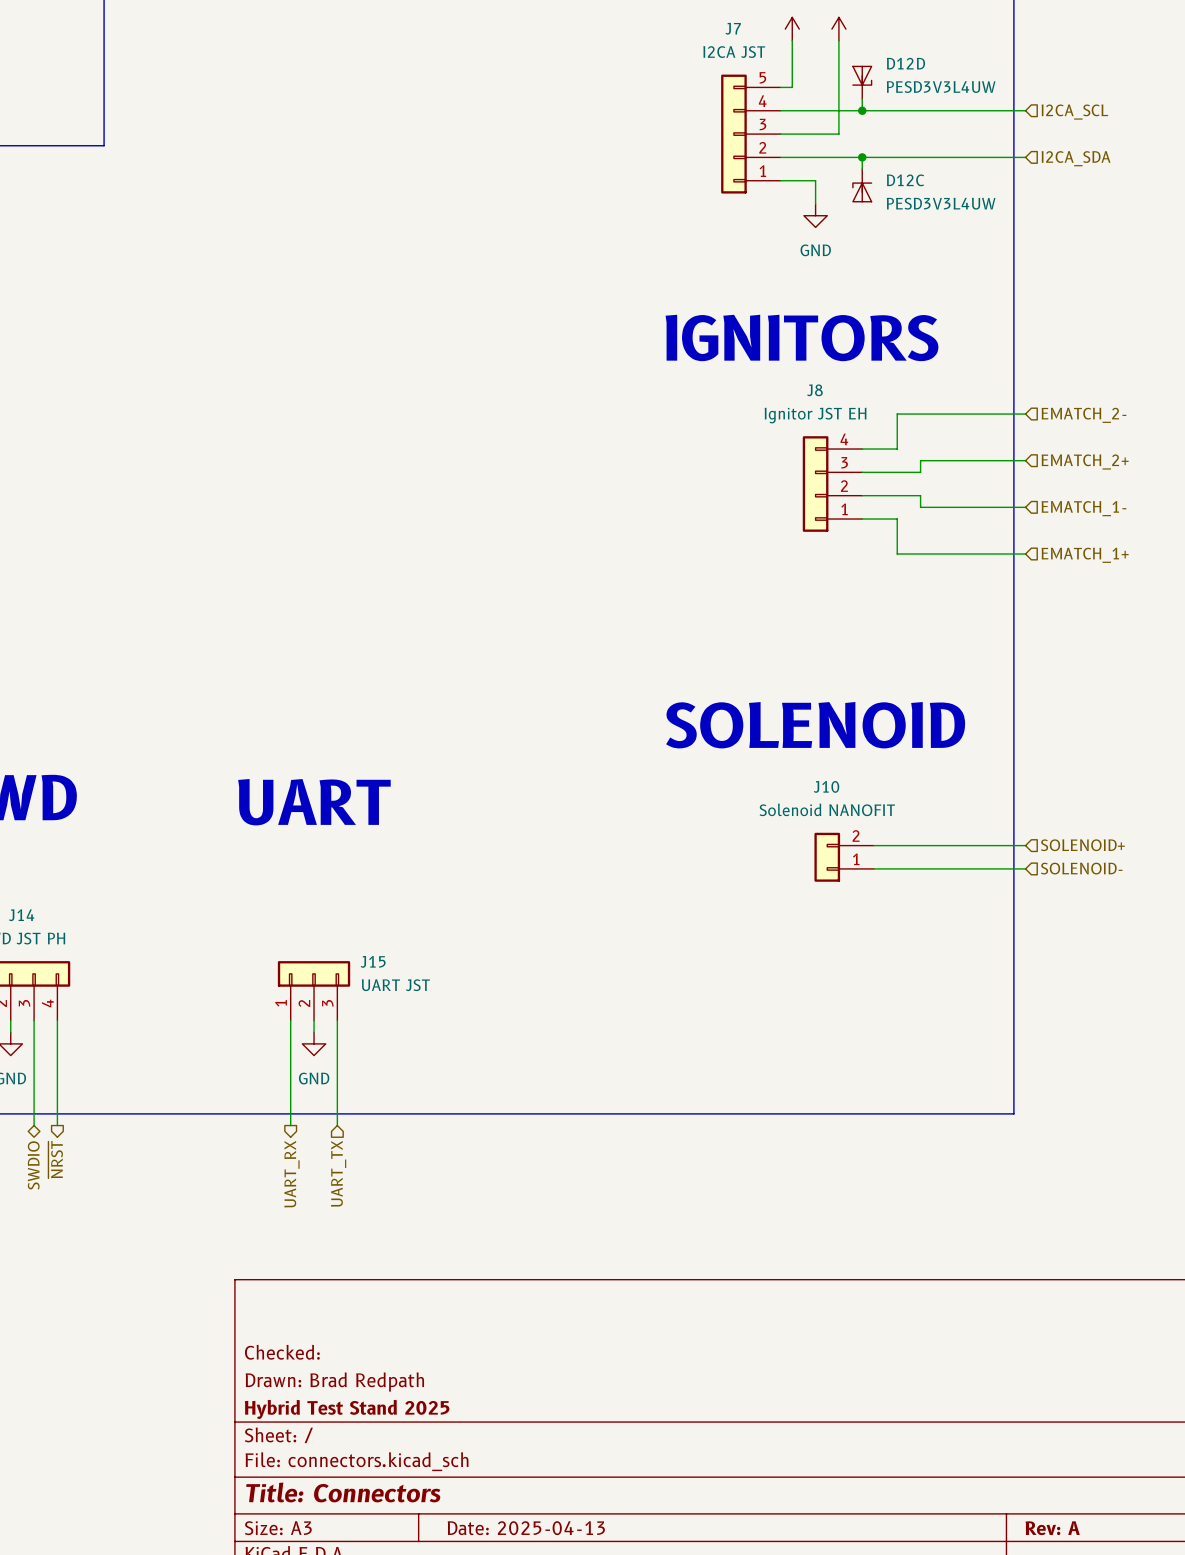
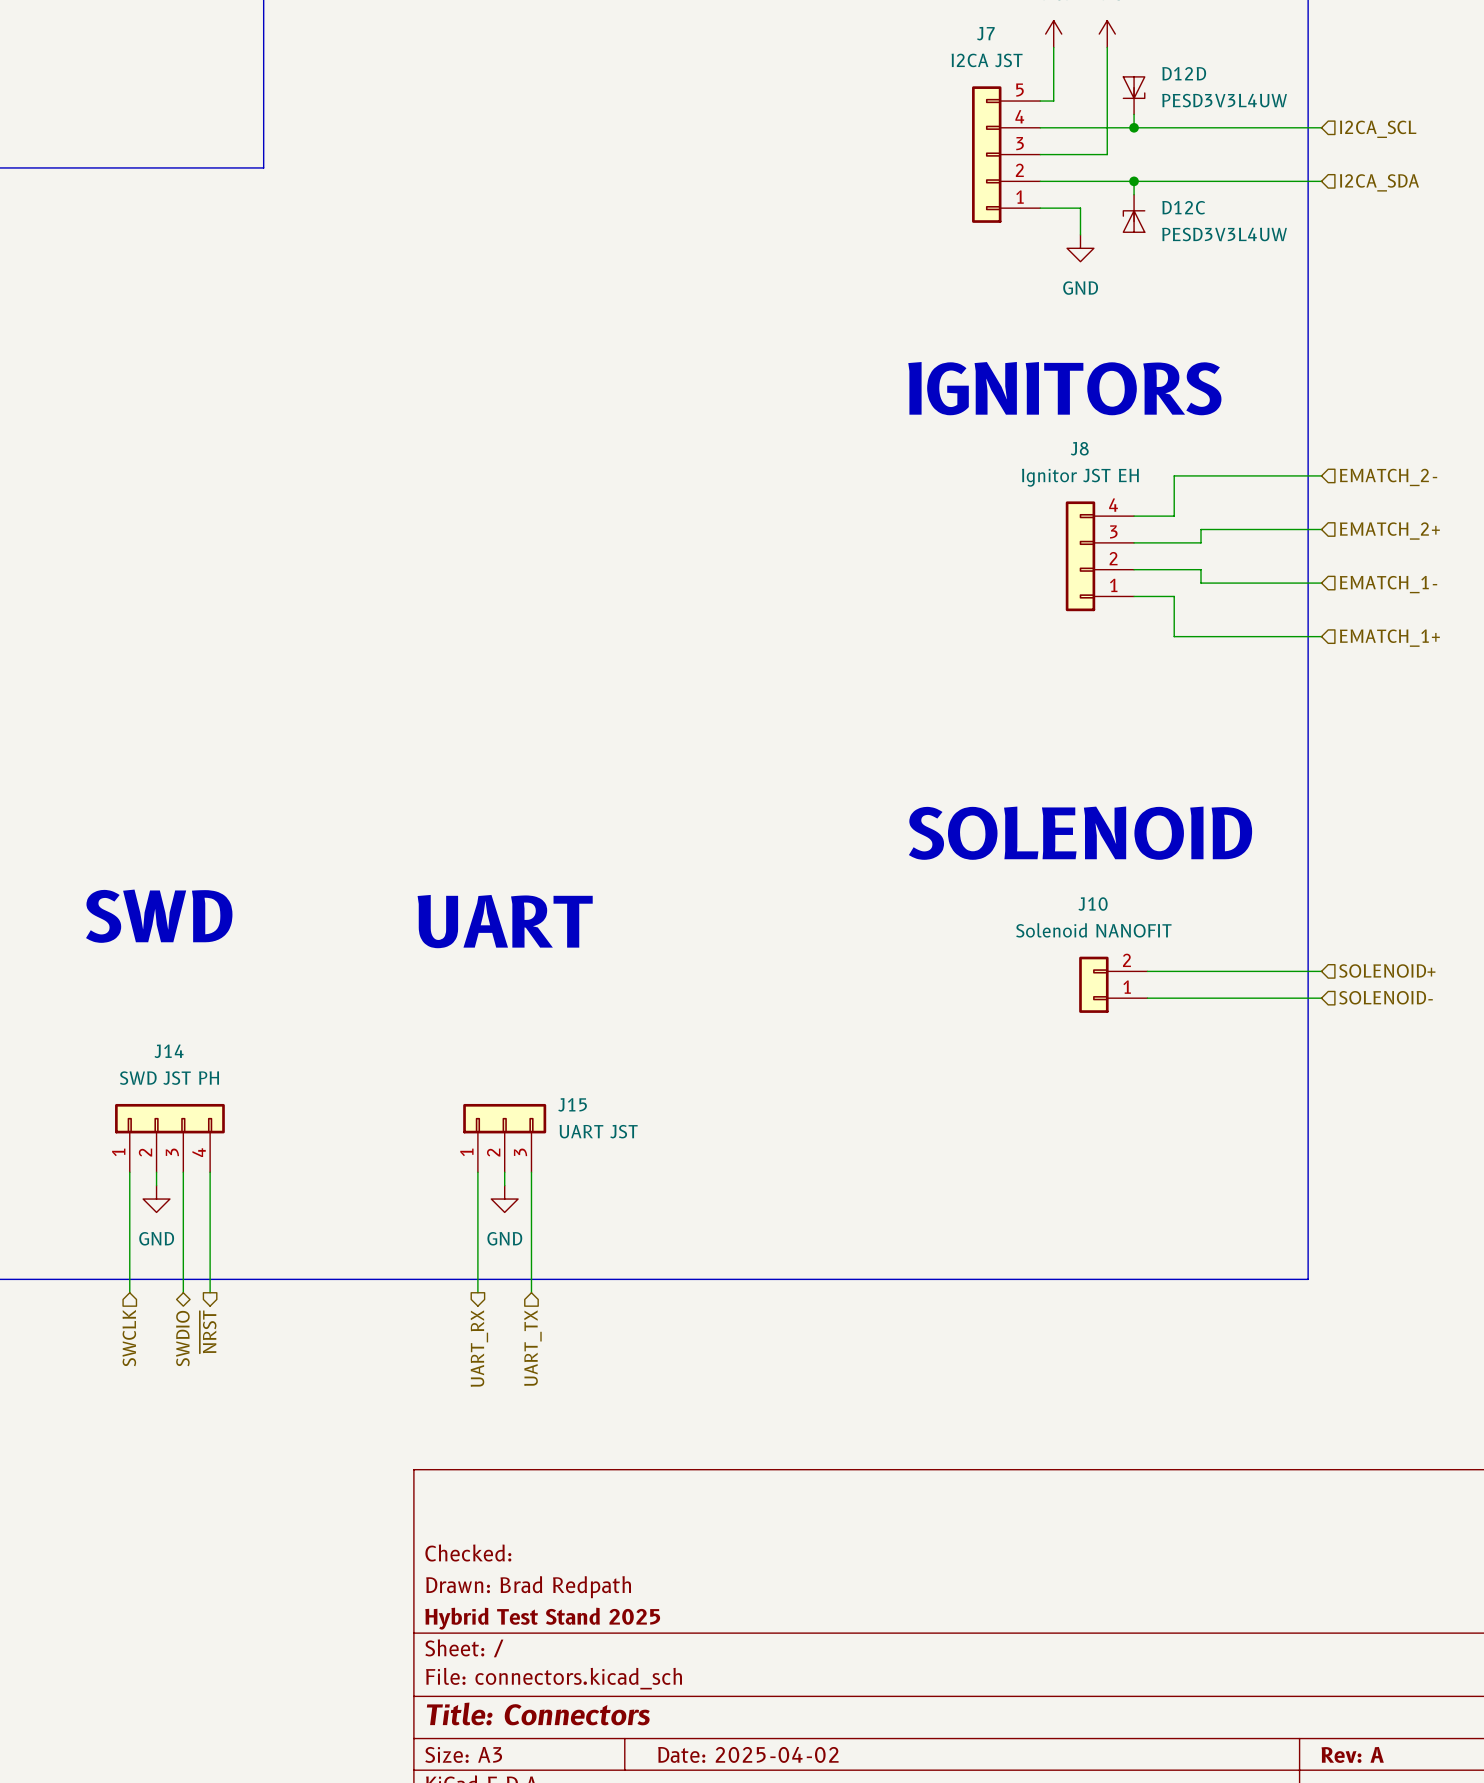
title block: Date: 2025-04-13 (526, 1528) -> Date: 2025-04-02 (748, 1754)

